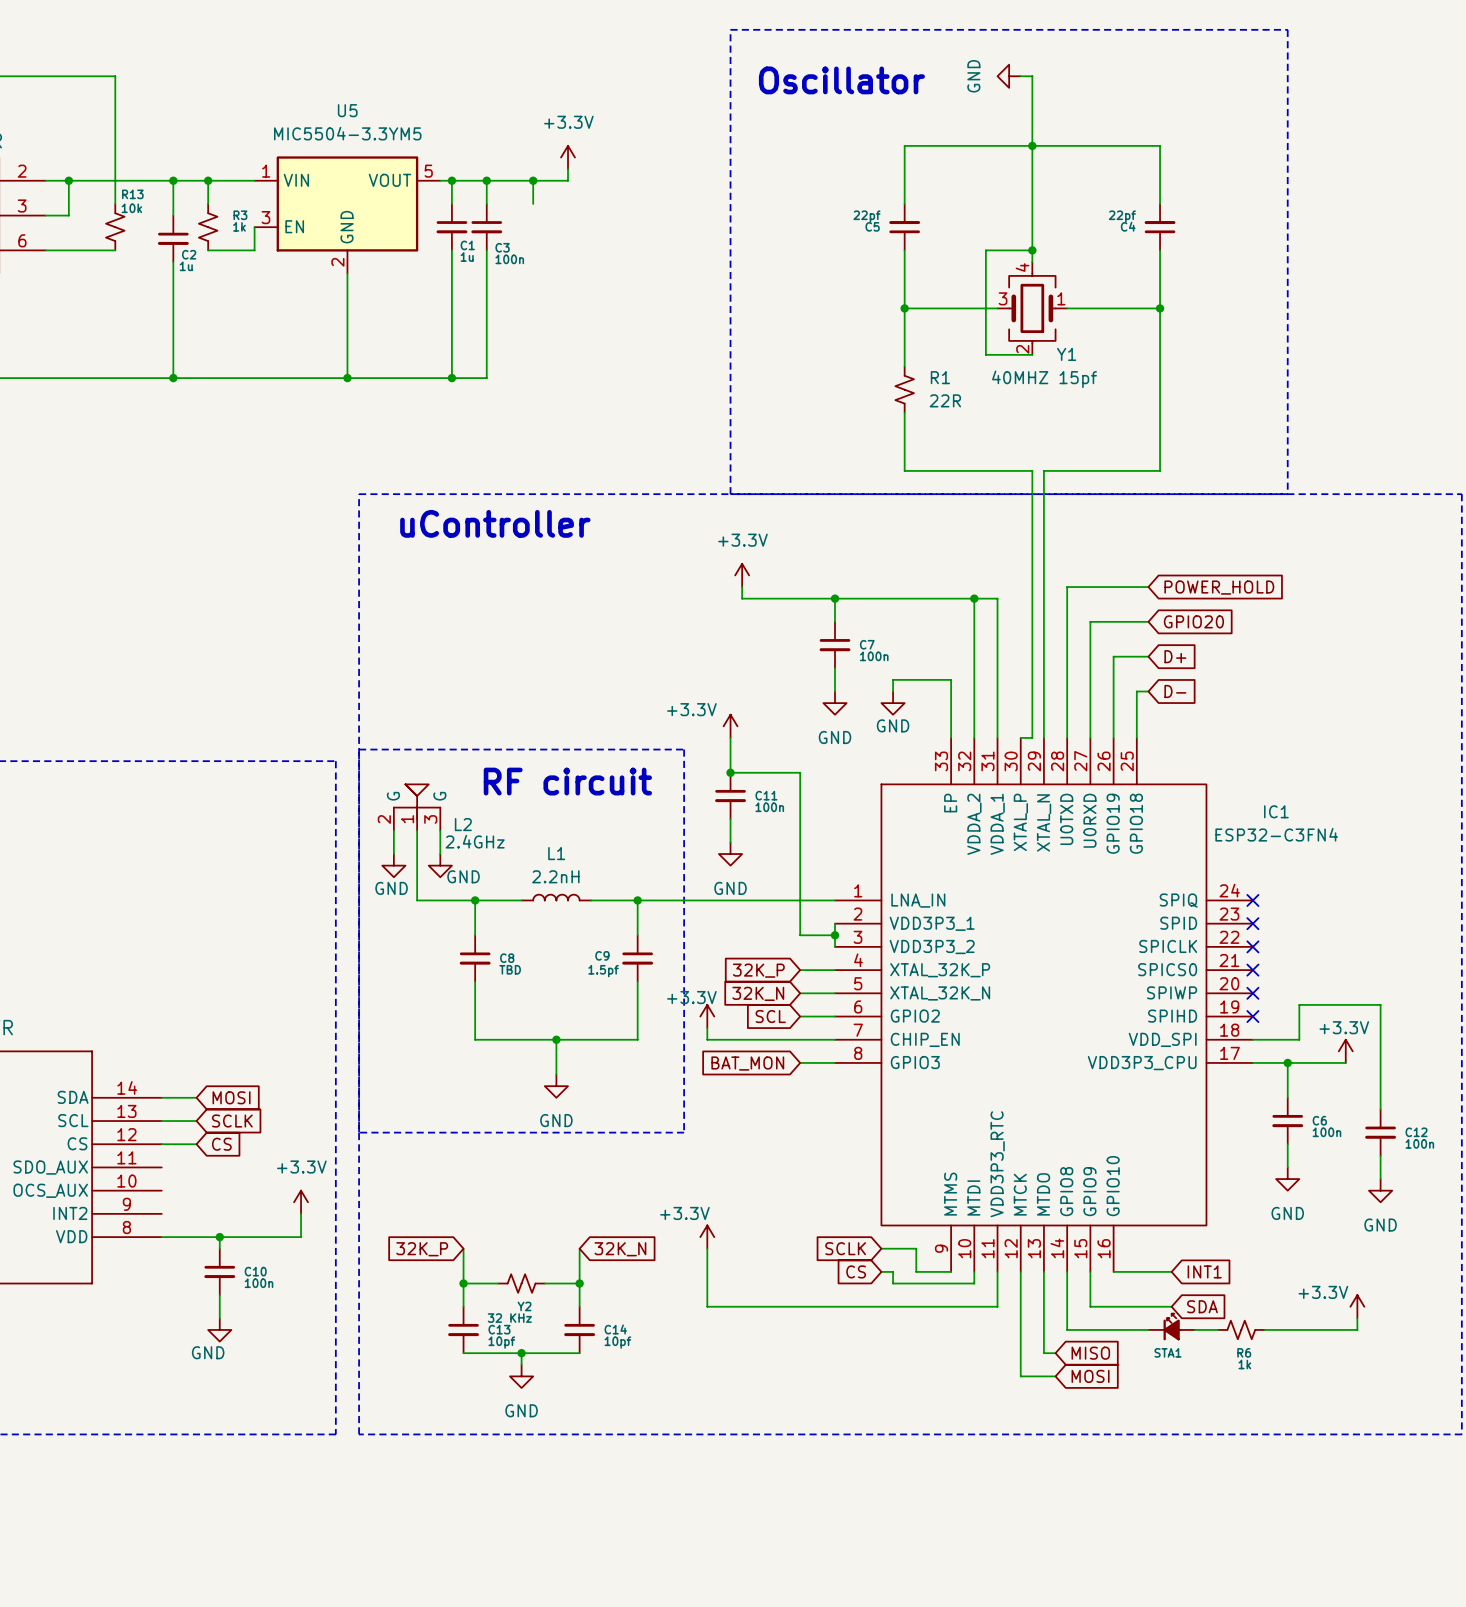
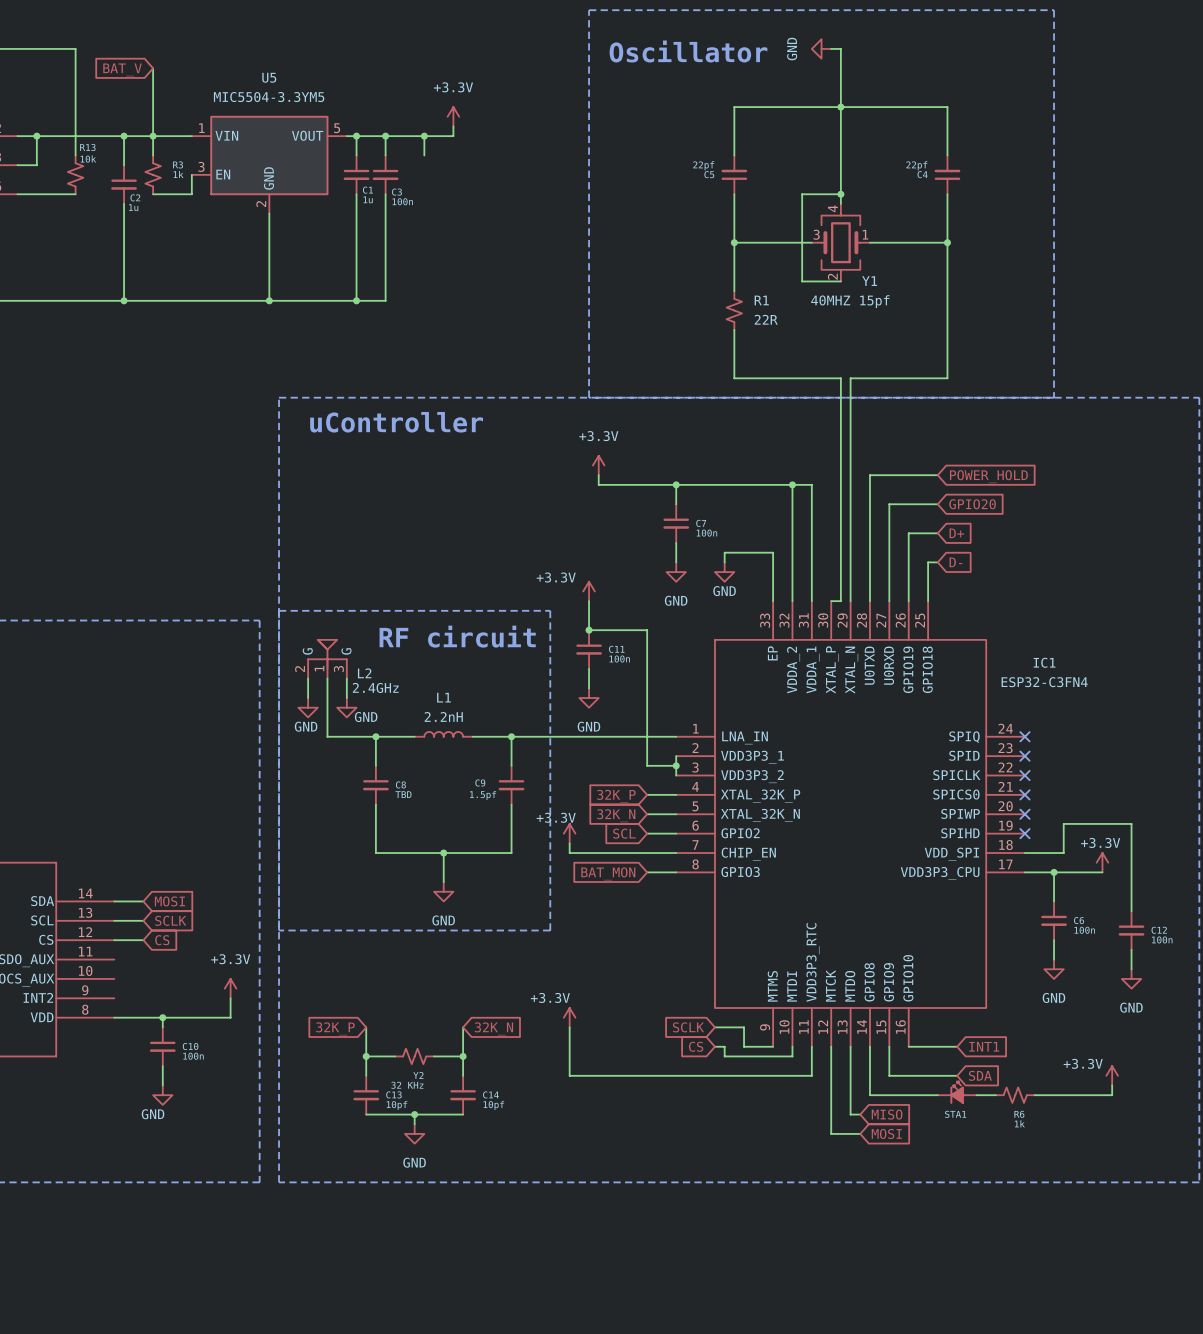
wire: none -> (153, 68) (153, 136)
global label: none -> BAT_V (122, 69)

